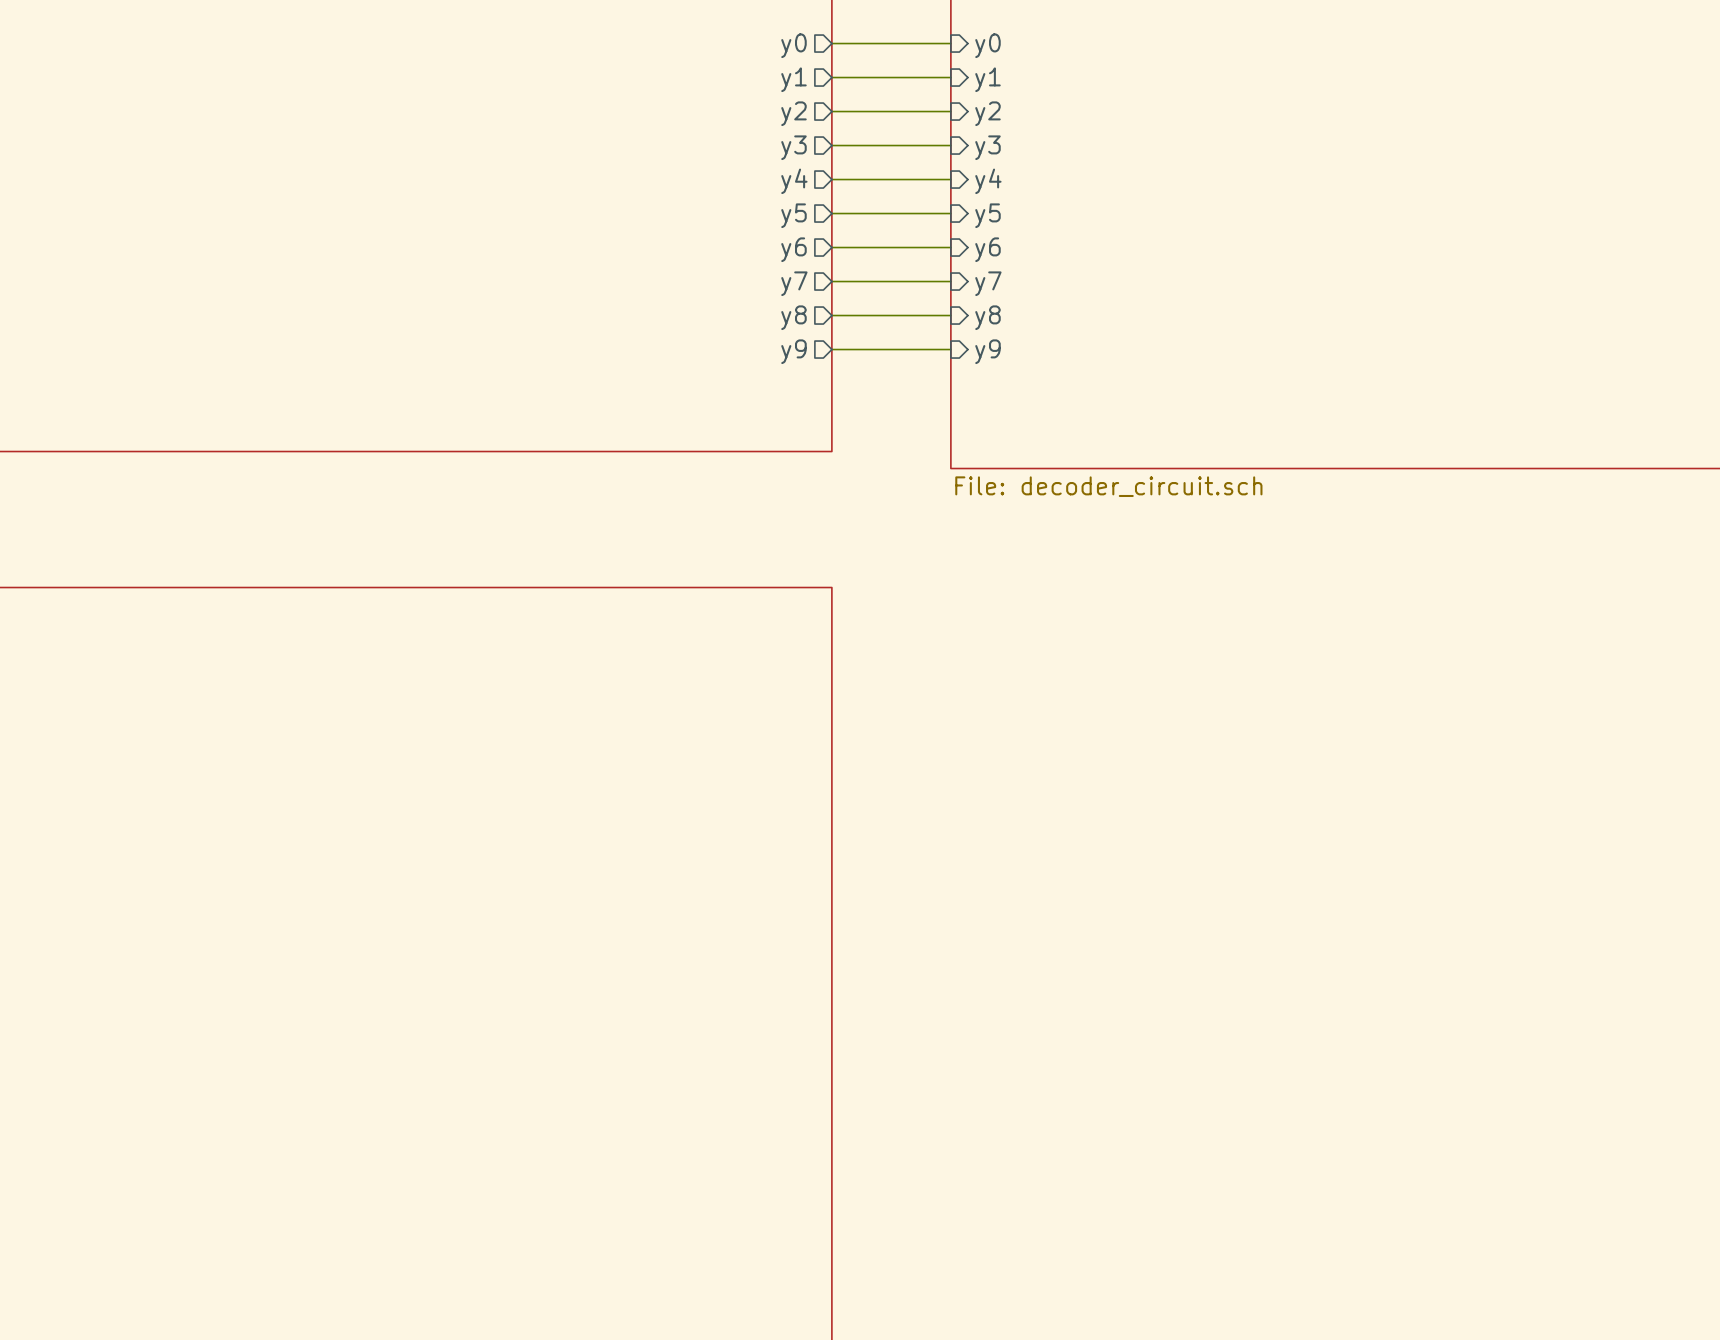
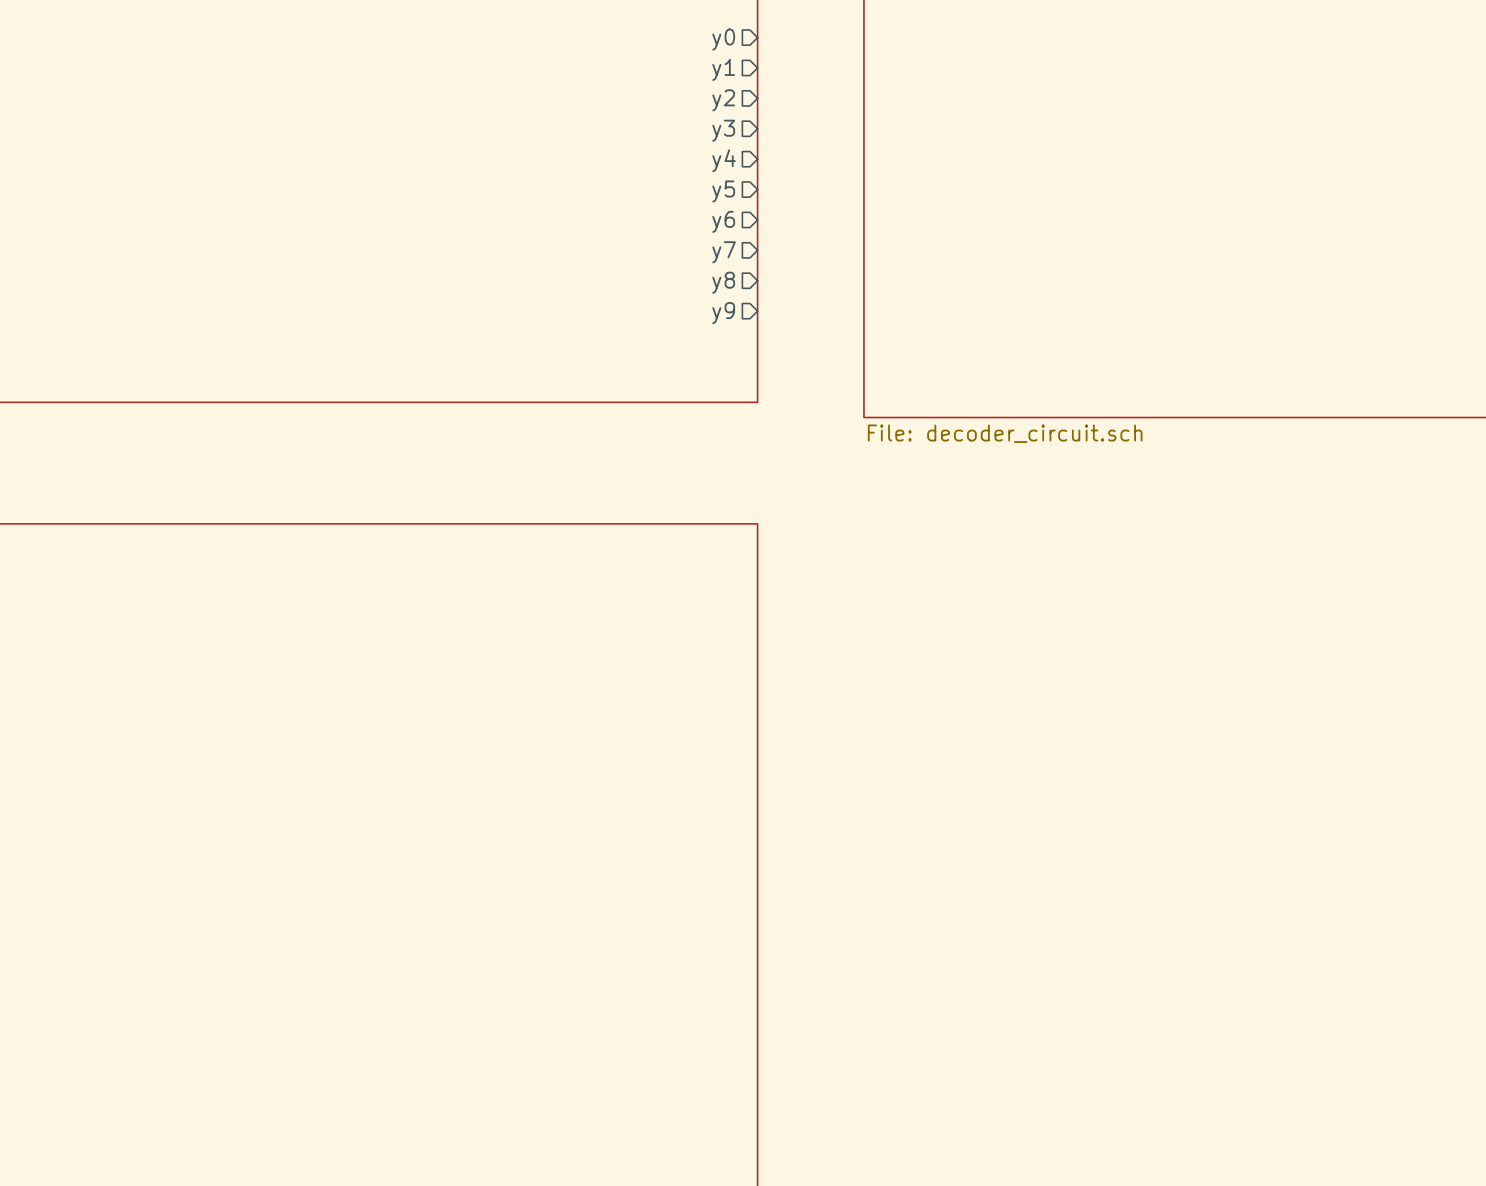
wire: (831, 43) (950, 43) -> none
sheet pin: y0 (987, 45) -> none
wire: (831, 77) (950, 77) -> none
sheet pin: y1 (987, 79) -> none
wire: (831, 111) (950, 111) -> none
sheet pin: y2 (987, 113) -> none
wire: (831, 145) (950, 145) -> none
sheet pin: y3 (987, 147) -> none
wire: (831, 179) (950, 179) -> none
sheet pin: y4 (988, 181) -> none
wire: (831, 213) (950, 213) -> none
sheet pin: y5 (987, 215) -> none
wire: (831, 247) (950, 247) -> none
sheet pin: y6 (987, 249) -> none
wire: (831, 281) (950, 281) -> none
sheet pin: y7 (988, 283) -> none
wire: (831, 315) (950, 315) -> none
sheet pin: y8 (987, 317) -> none
wire: (831, 349) (950, 349) -> none
sheet pin: y9 (987, 351) -> none

